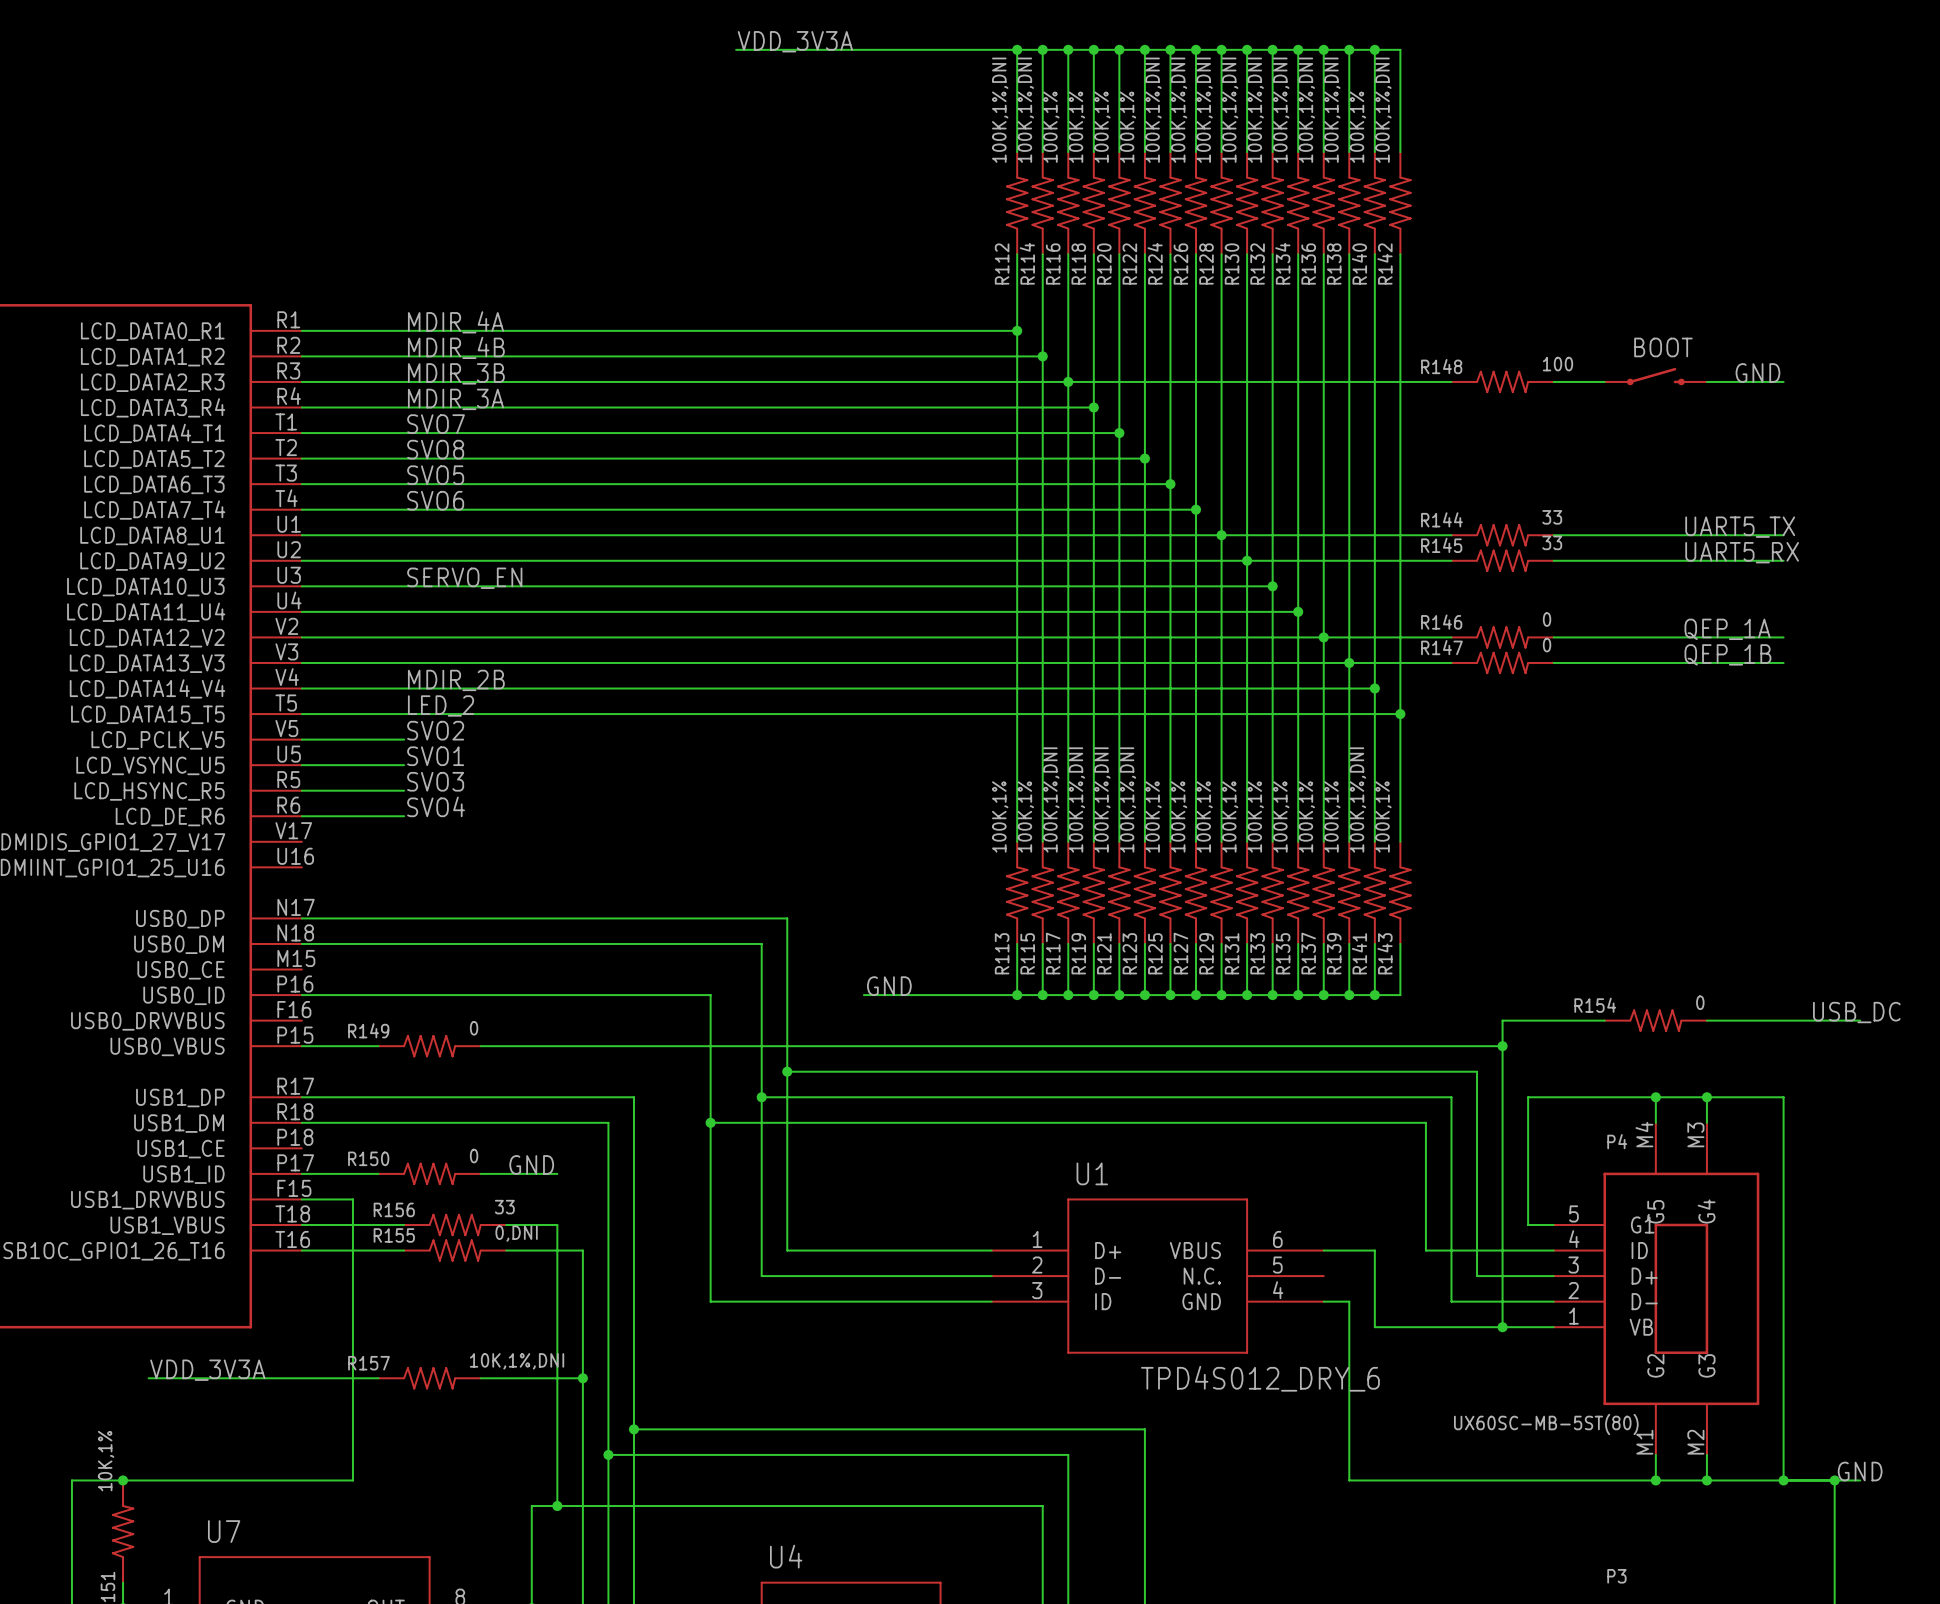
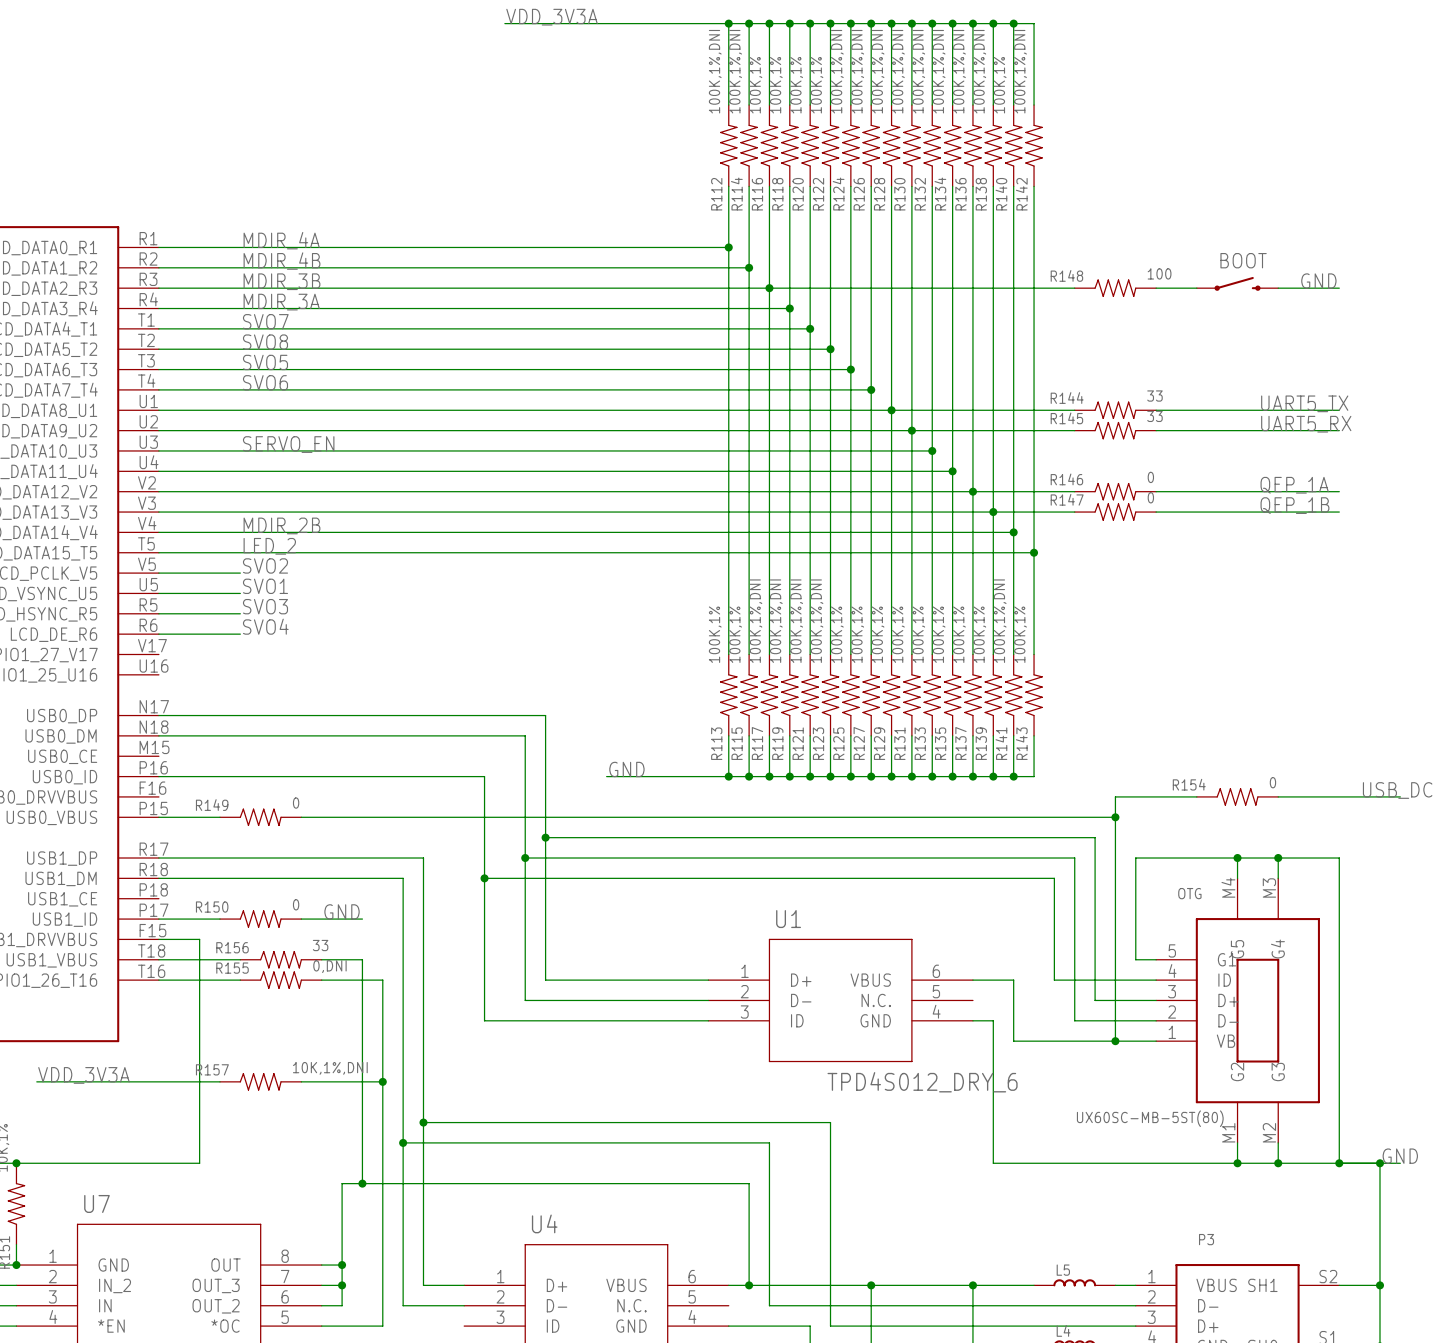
OTG name: none -> OTG (1189, 893)
OTG text: P4 (1617, 1141) -> none

